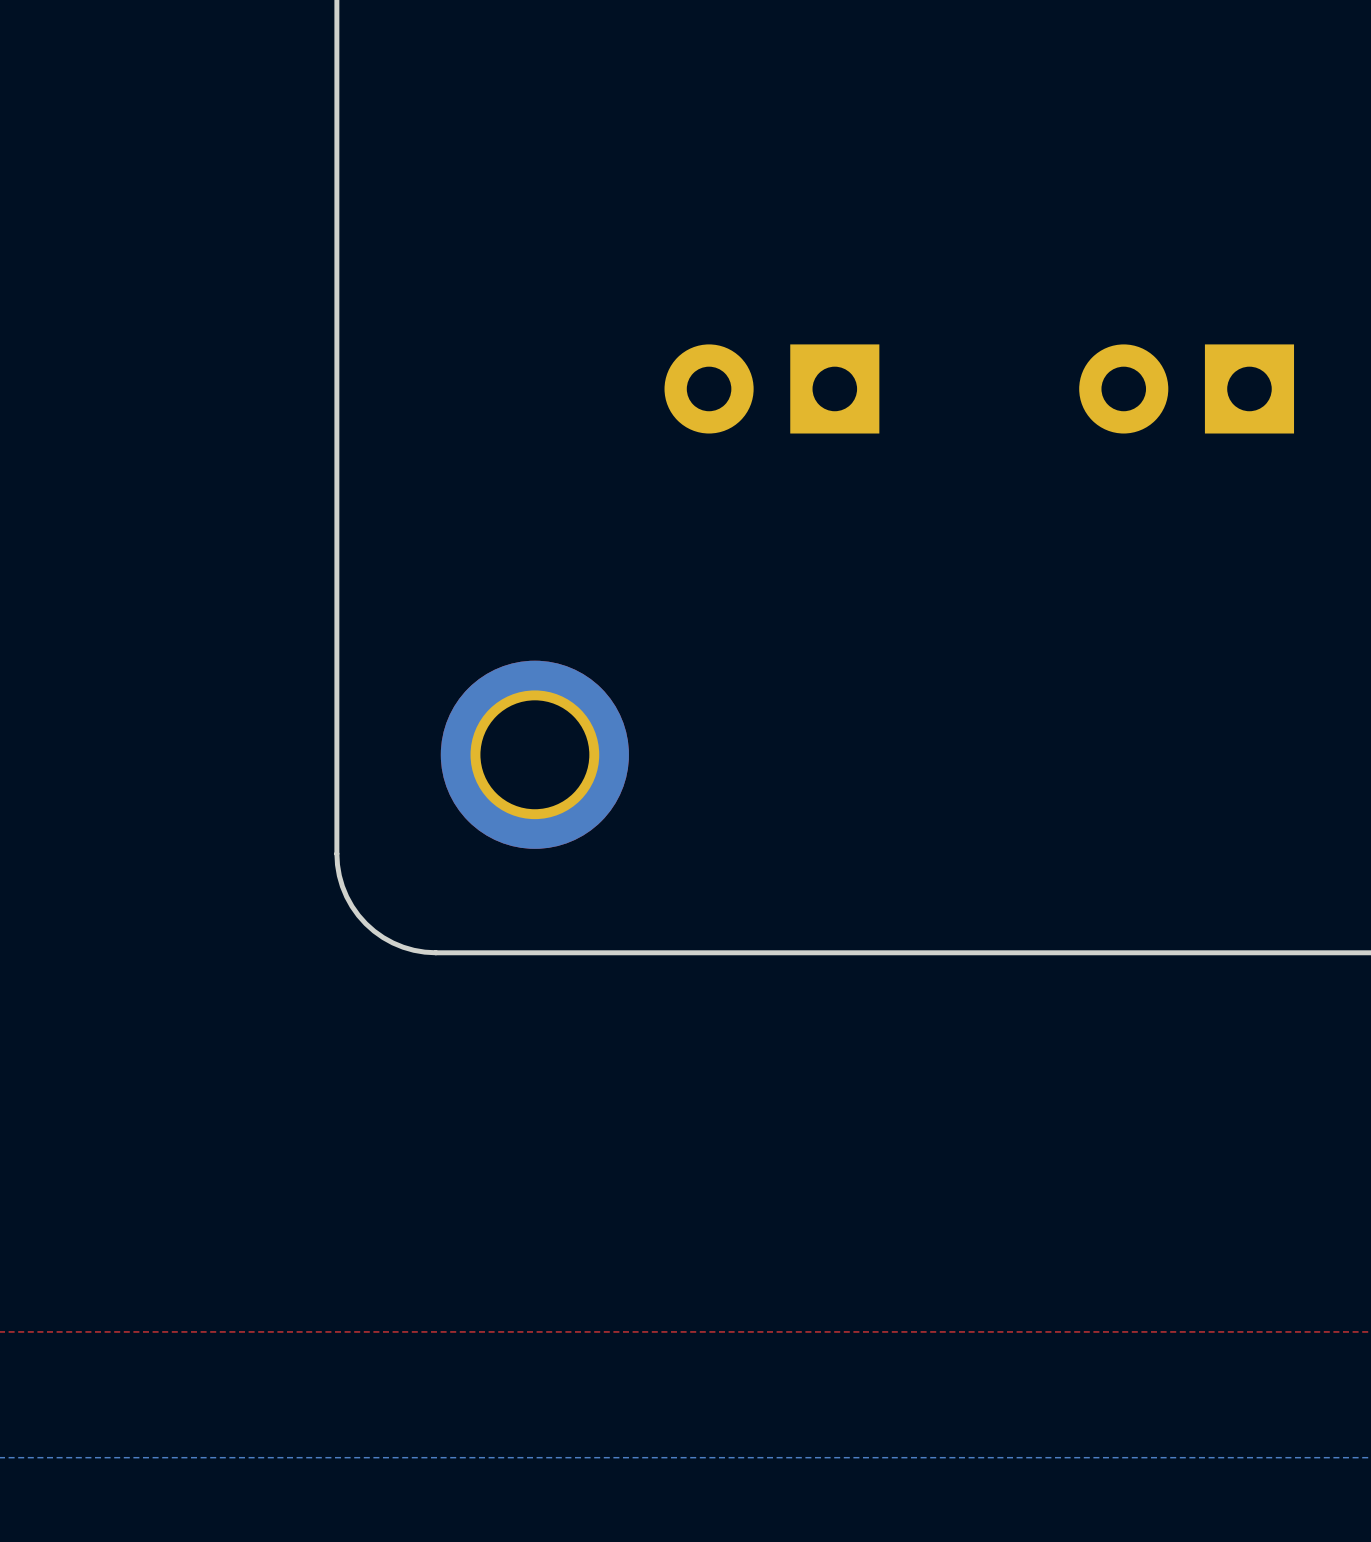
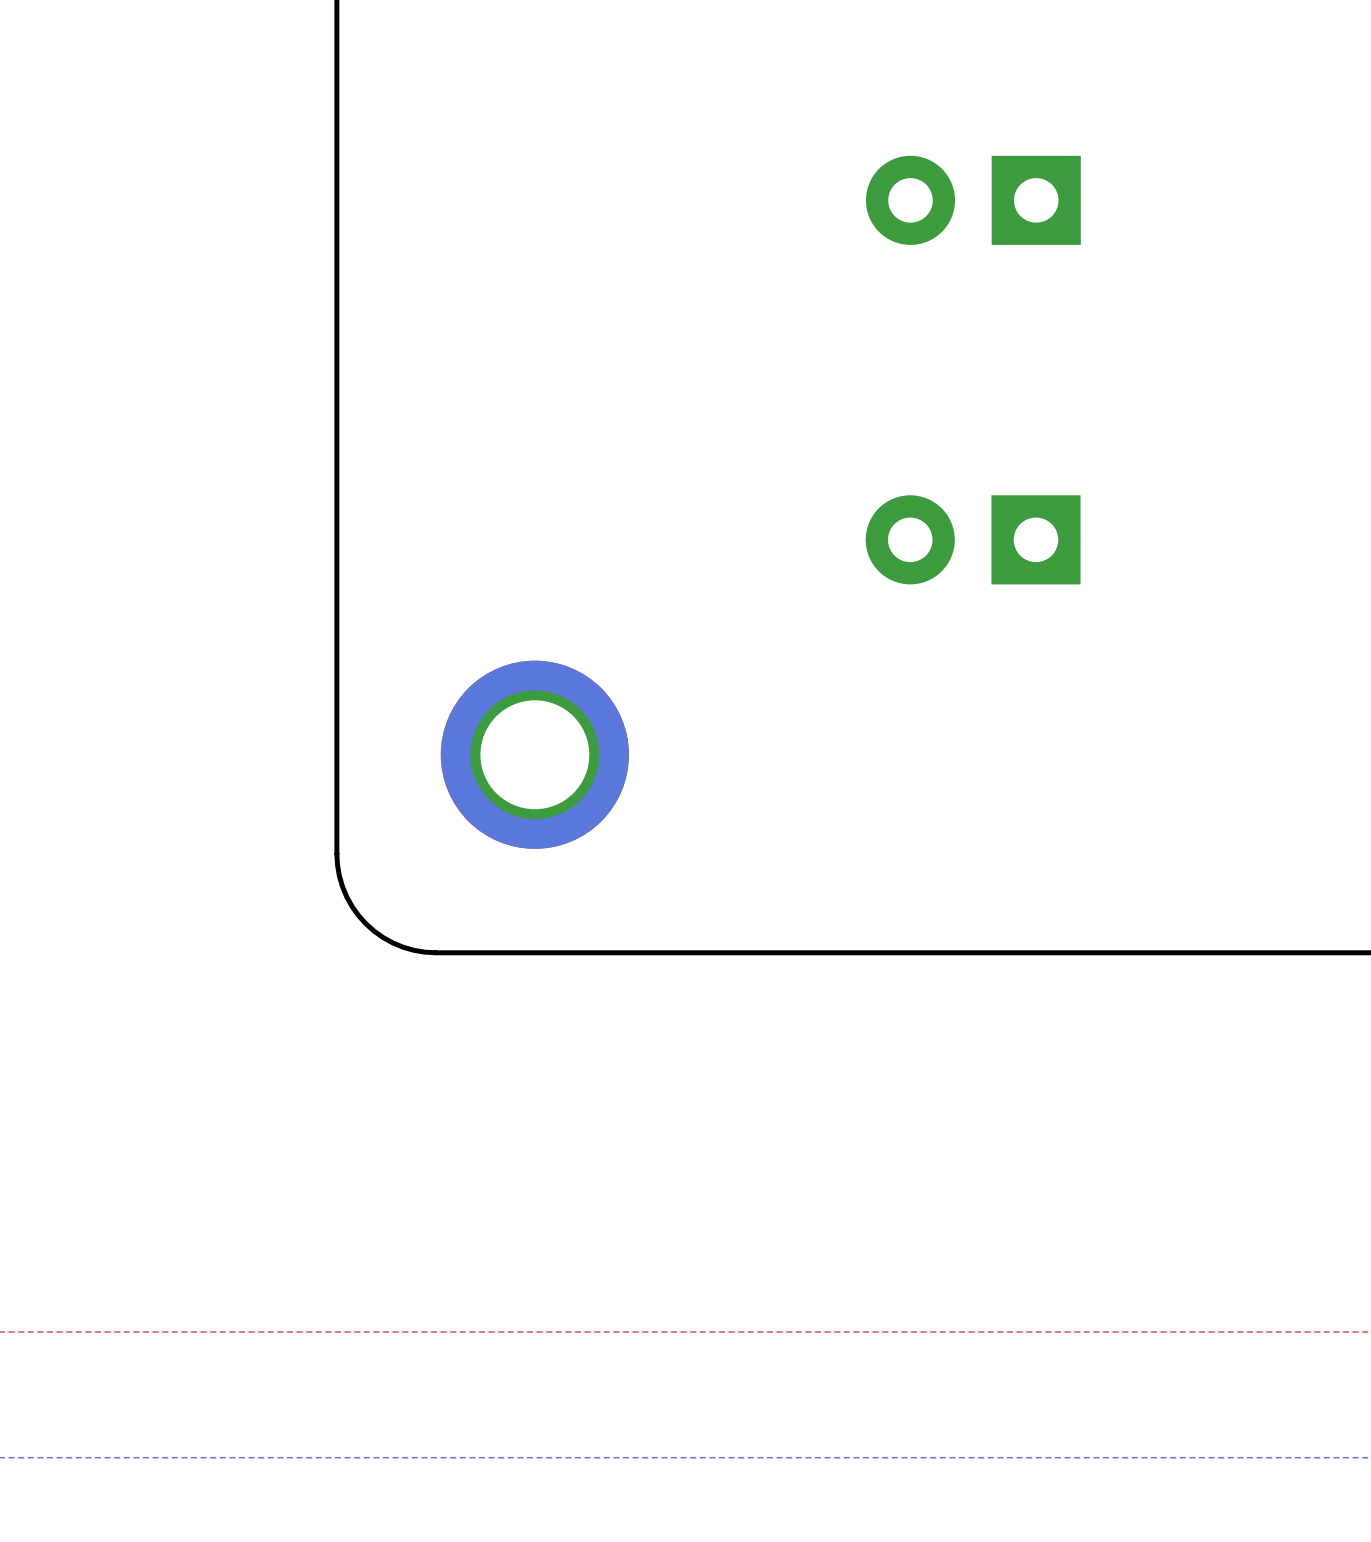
part: none -> (973, 200)
part: (771, 388) -> none
part: (1186, 388) -> none
part: none -> (973, 539)

